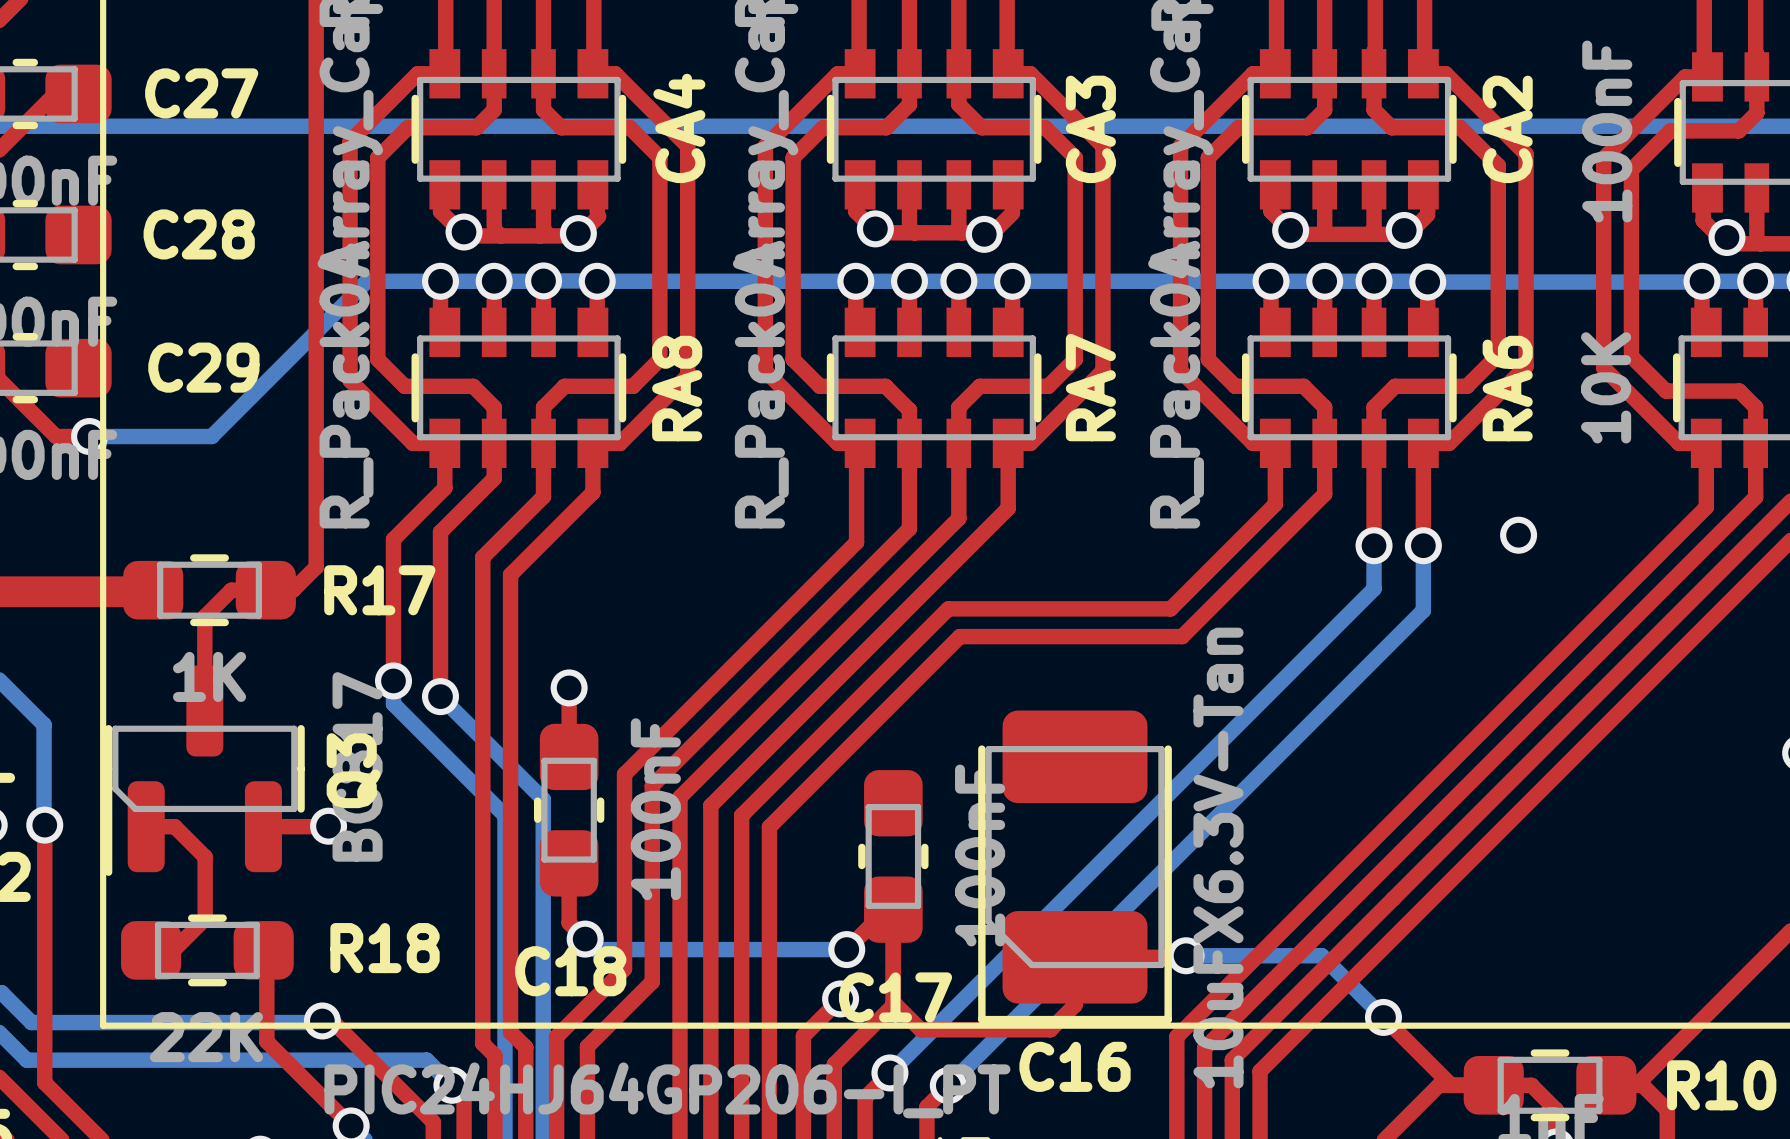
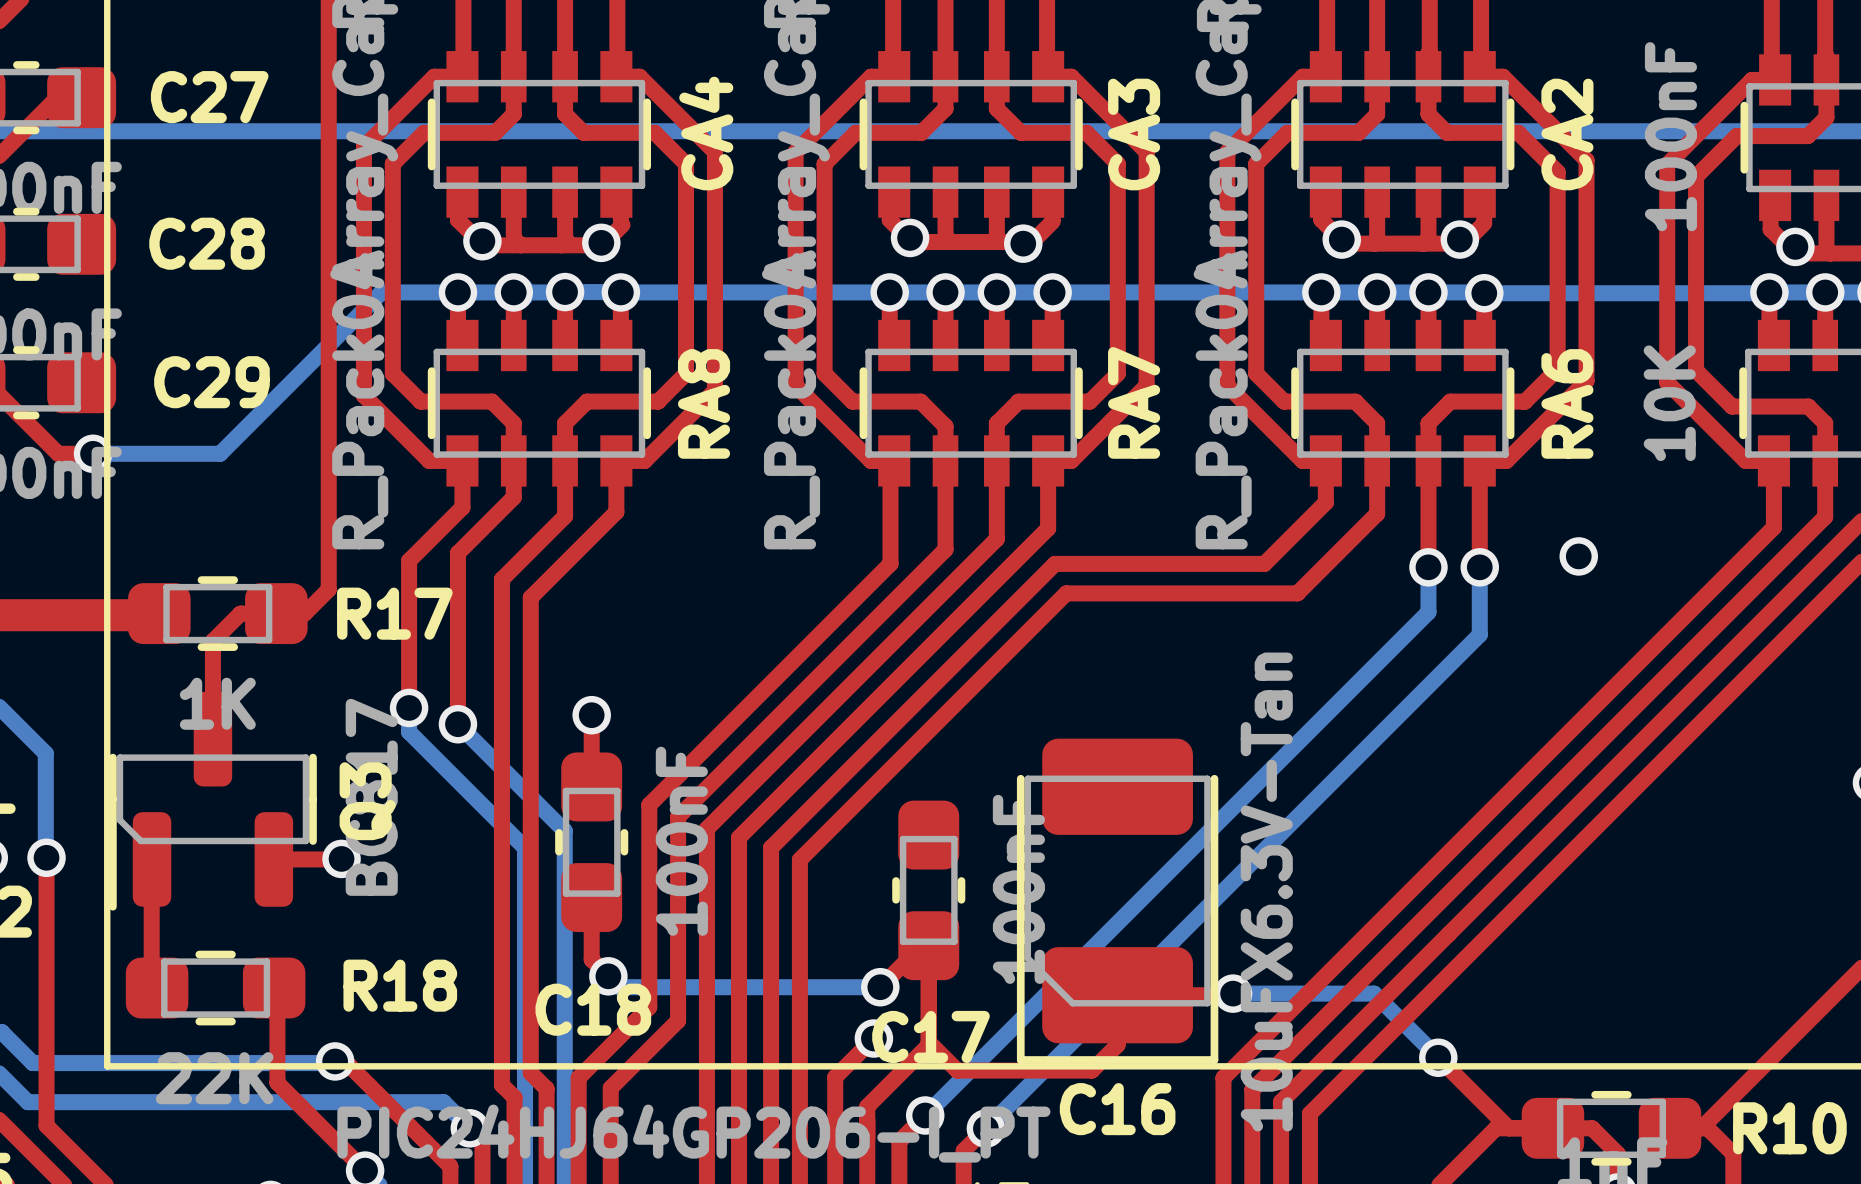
top track: (1275, 483) (1275, 504) (1170, 608) (948, 608) -> (1325, 502) (1264, 563) (1055, 563) (985, 632)
top track: (1248, 570) (1182, 636) (959, 636) -> (1297, 593) (1066, 593) (997, 661)
top track: (146, 826) (174, 826) (205, 857) (205, 918) (173, 950) (151, 950) -> (151, 889) (151, 982) (157, 988)

